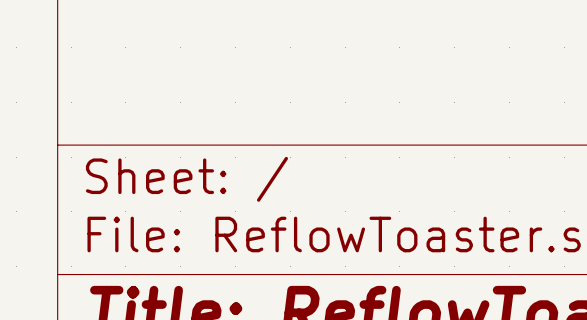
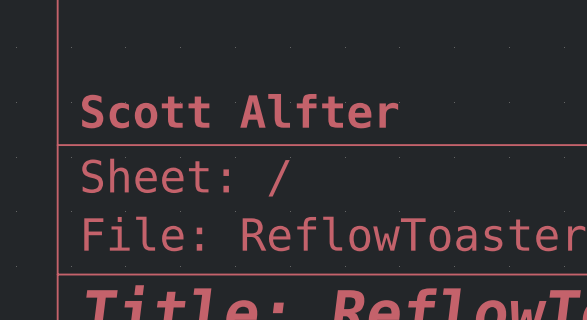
title block: none -> Scott Alfter (240, 111)

